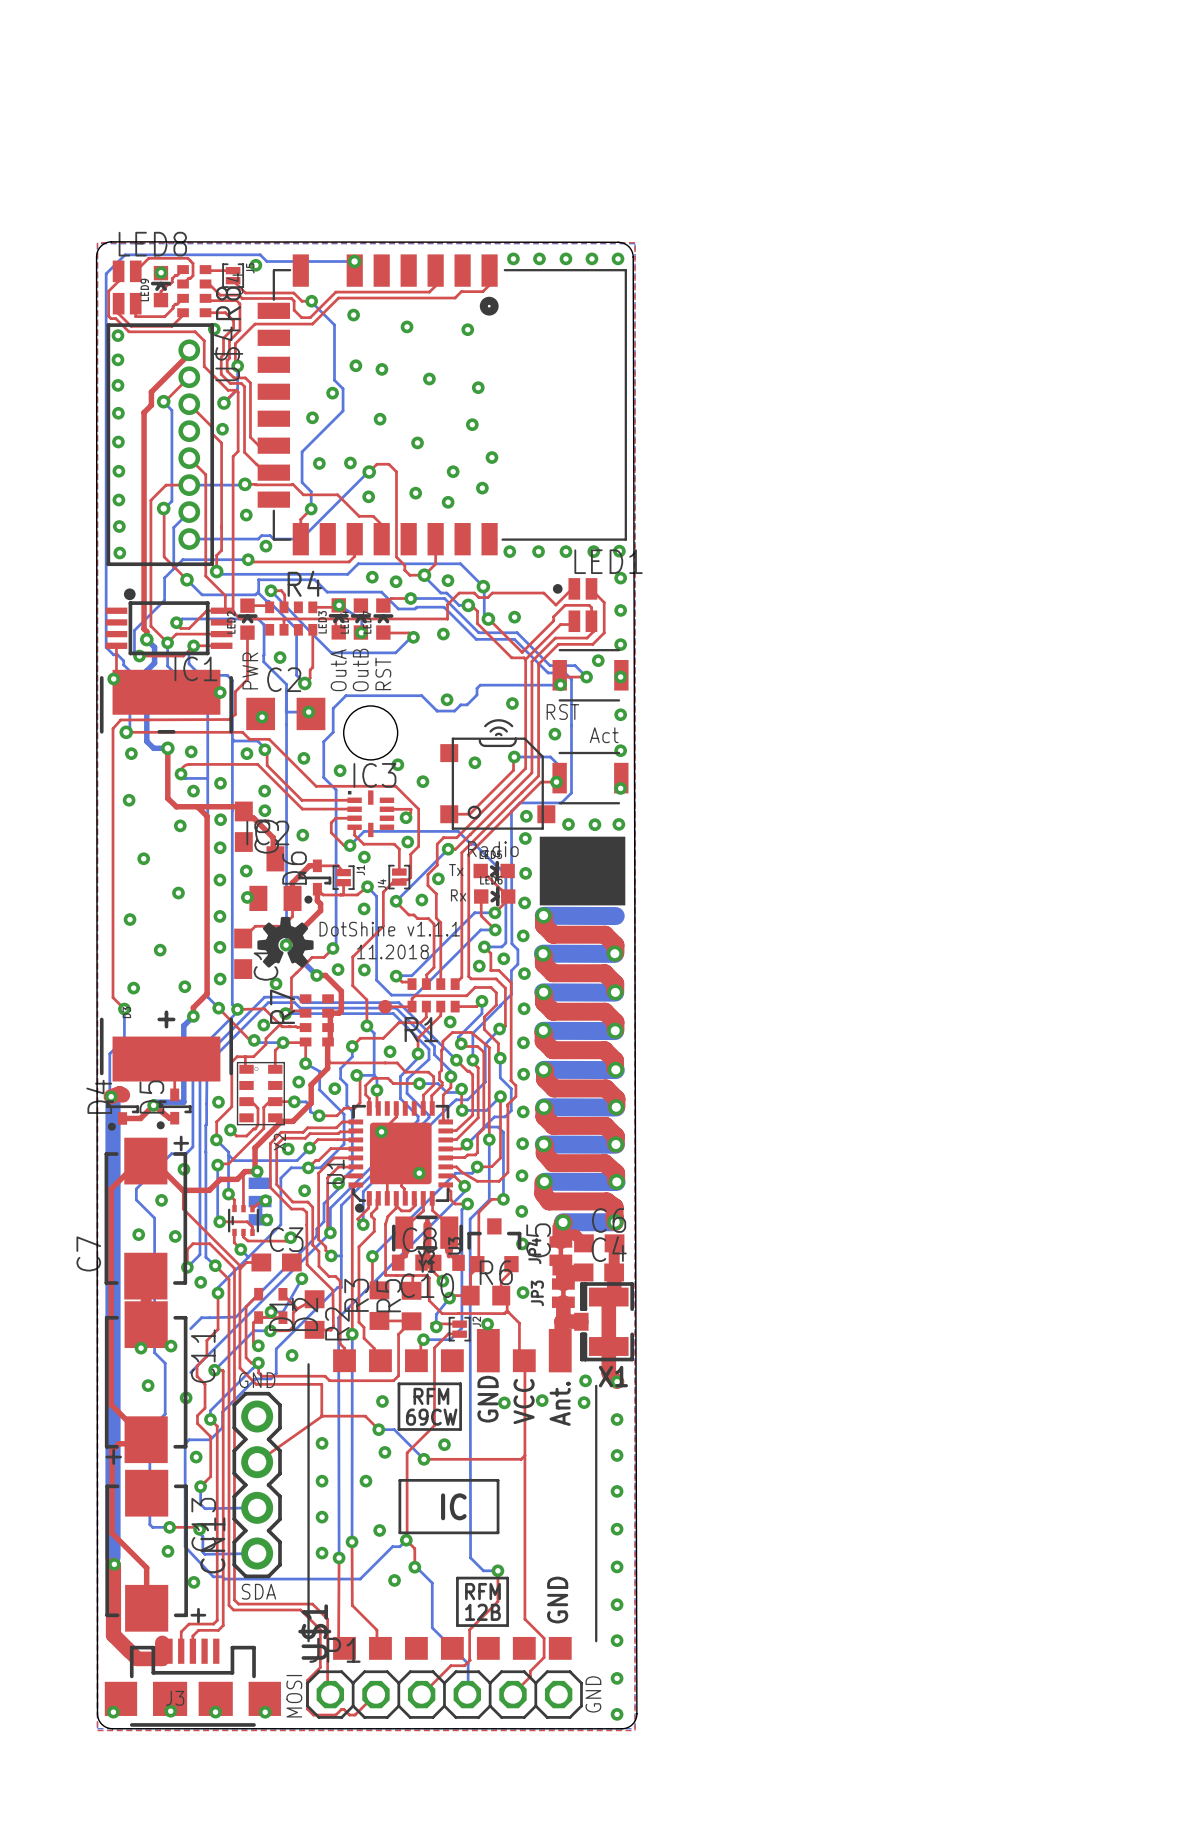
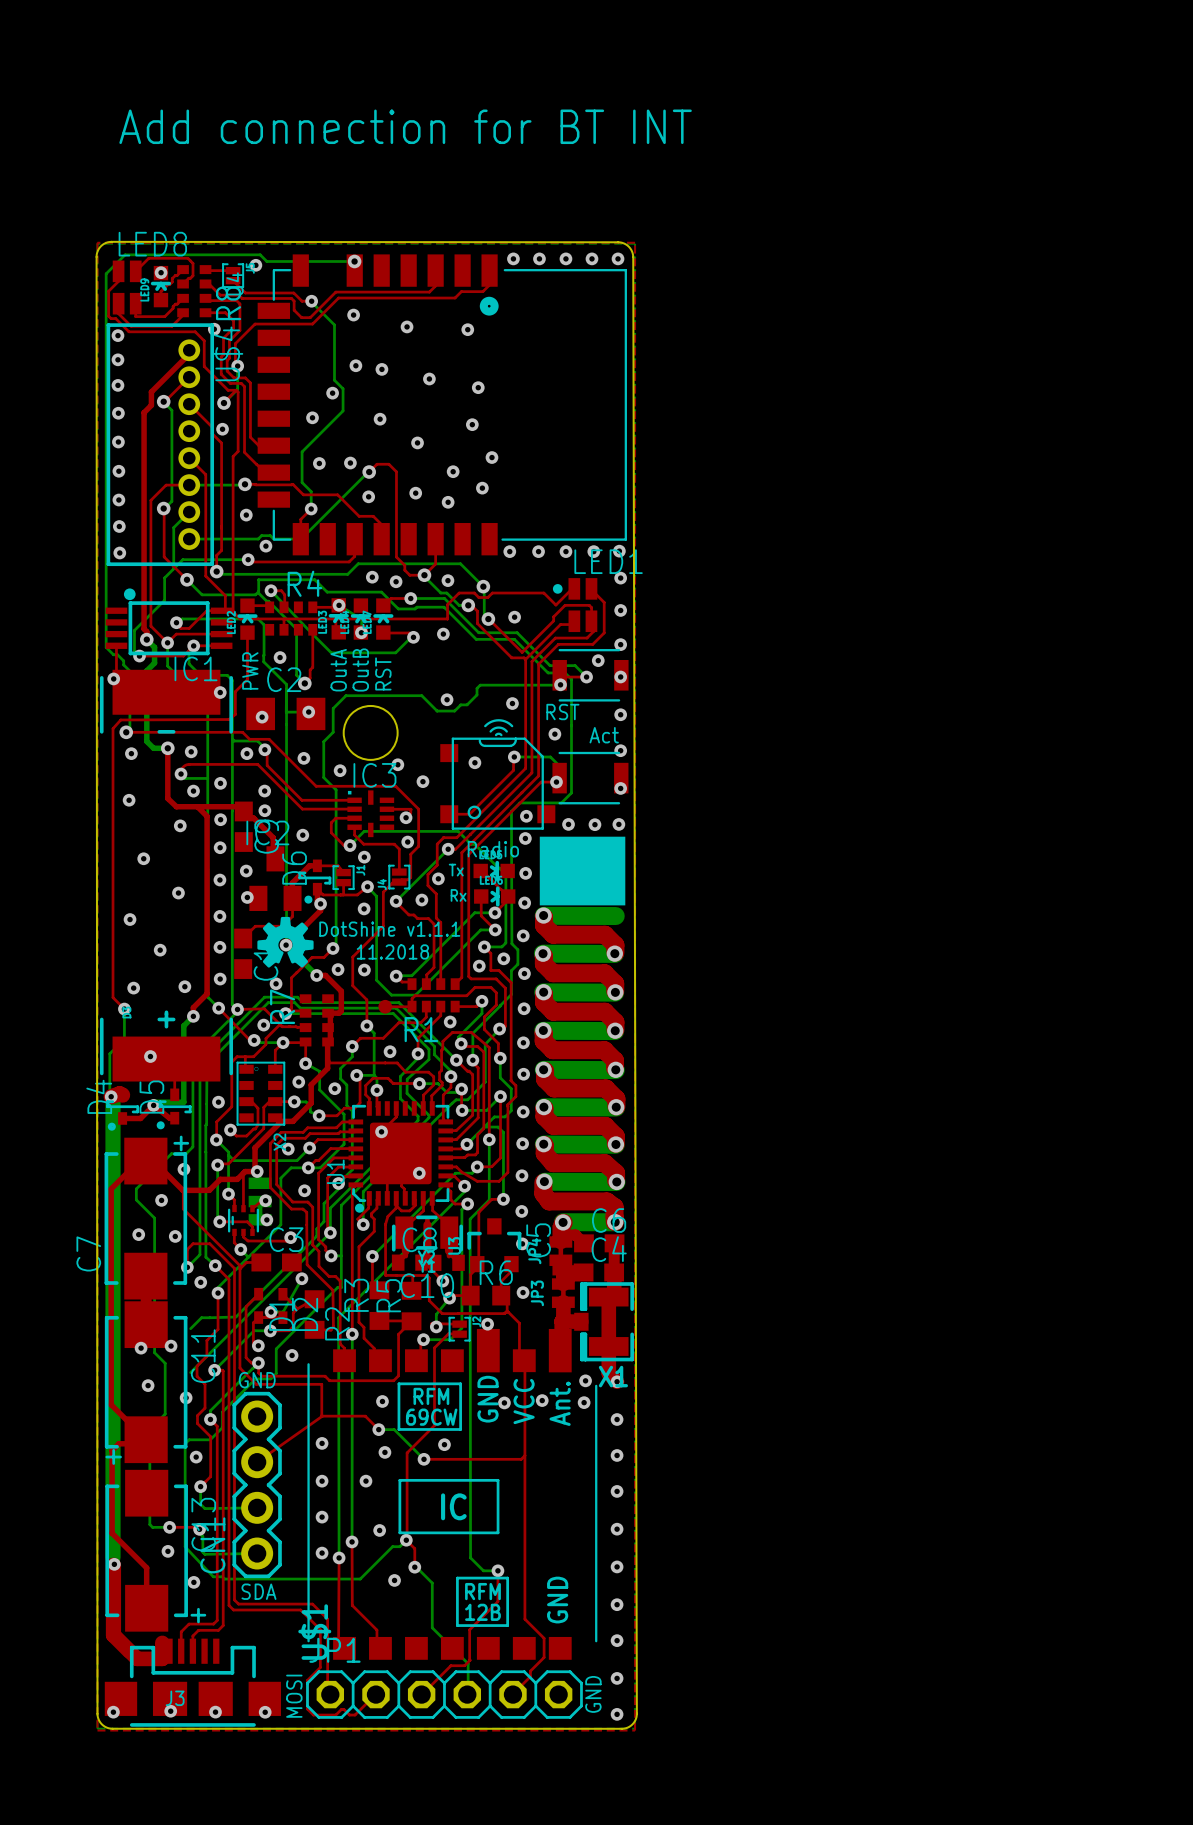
text: none -> Add connection for BT INT (405, 126)
via: none -> (320, 903)
via: none -> (150, 1056)

